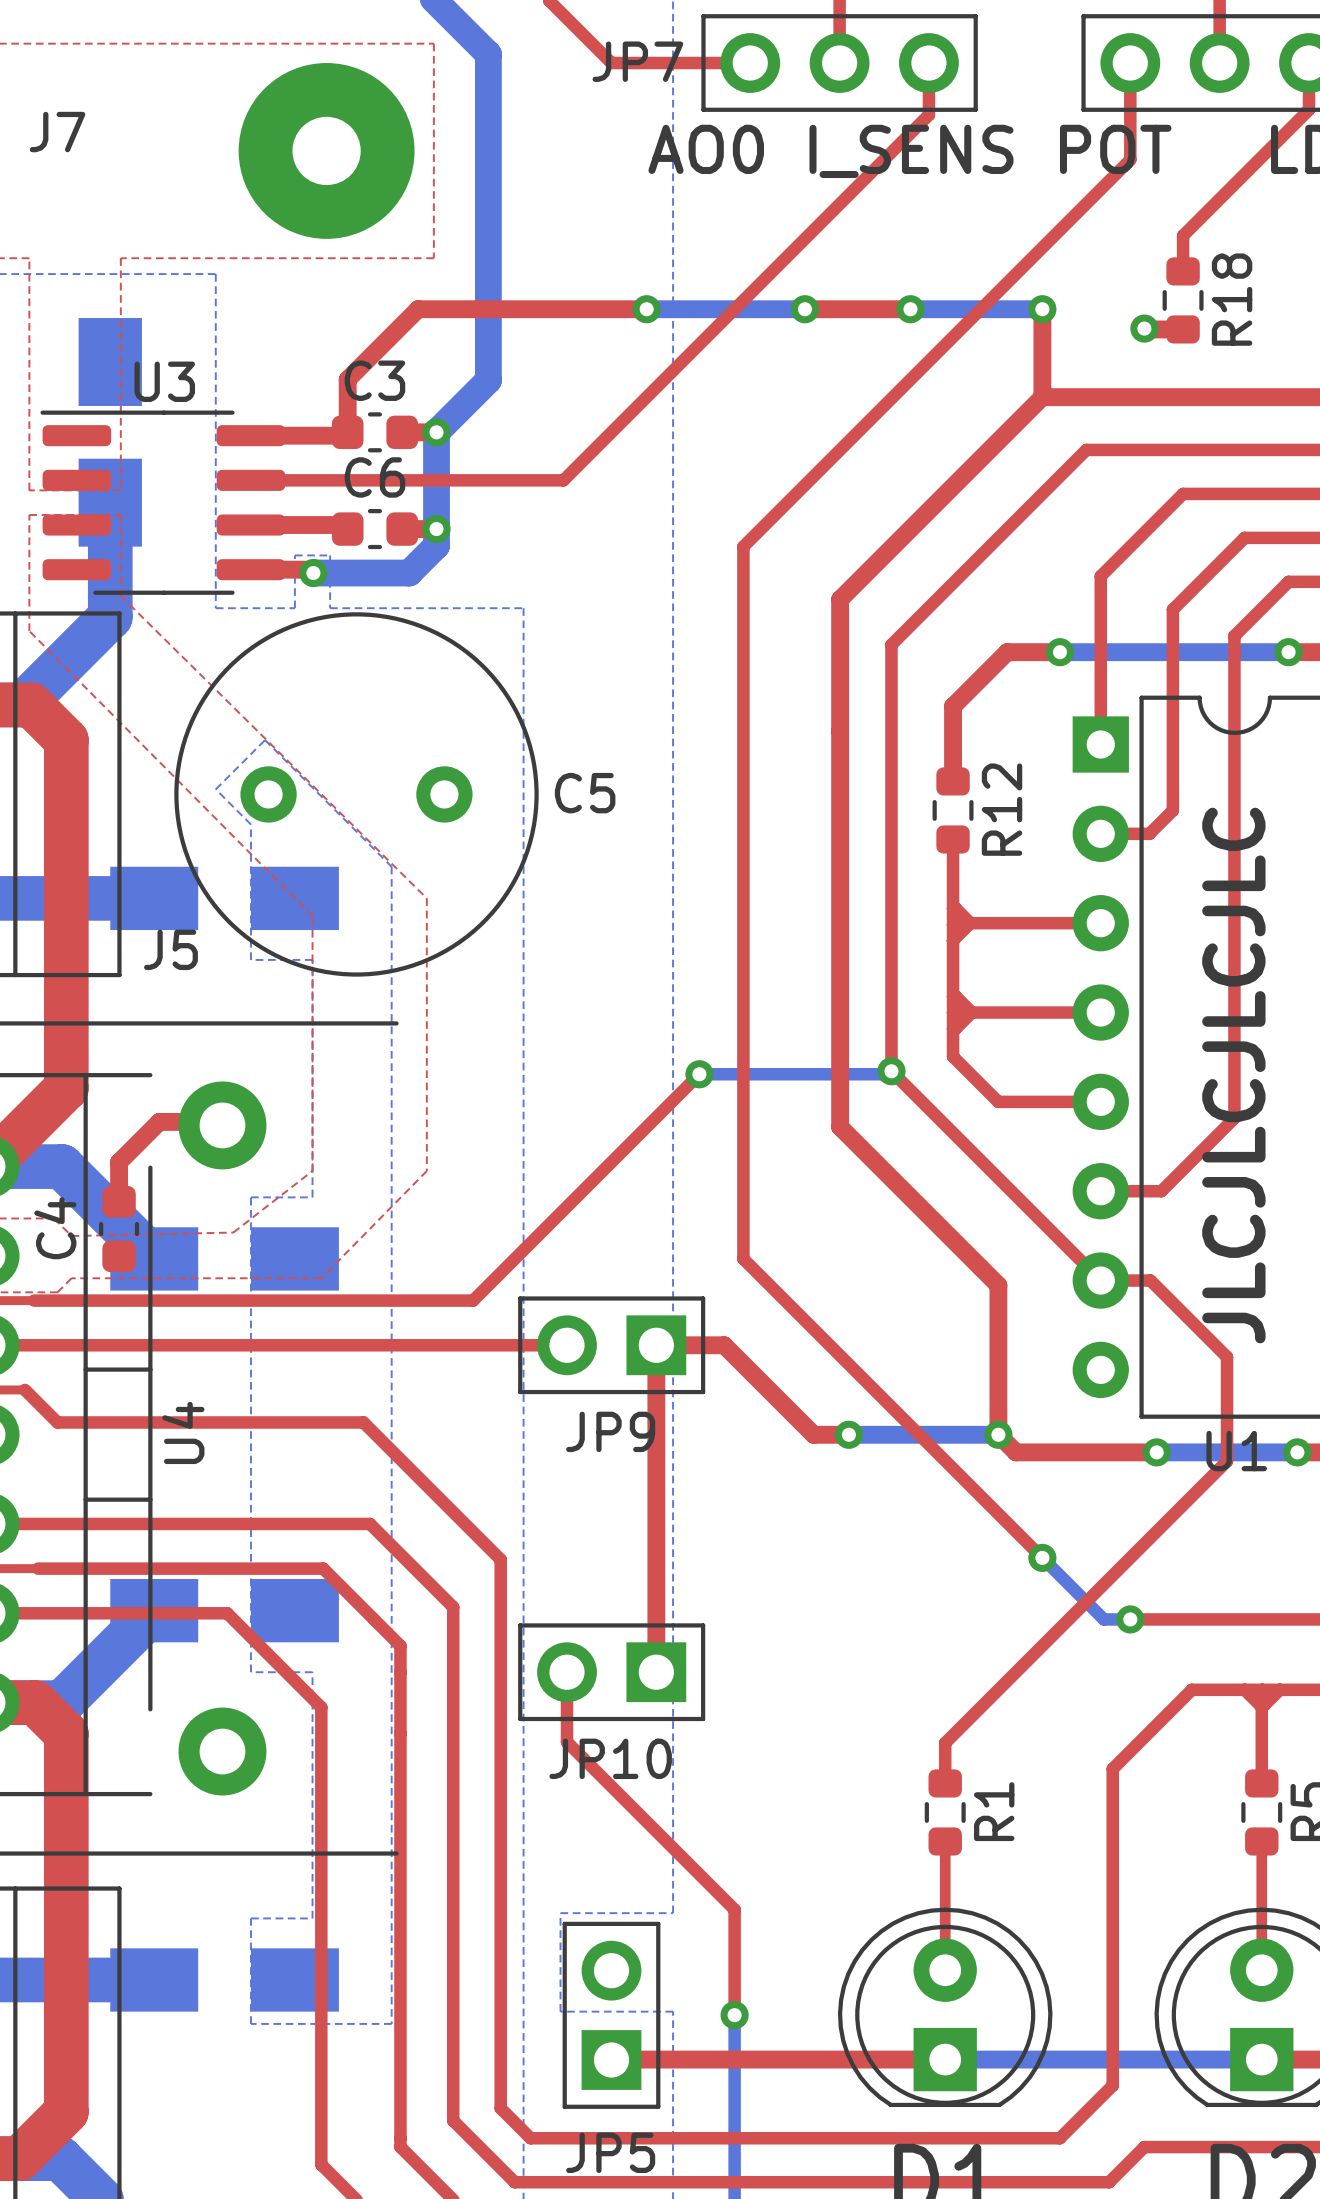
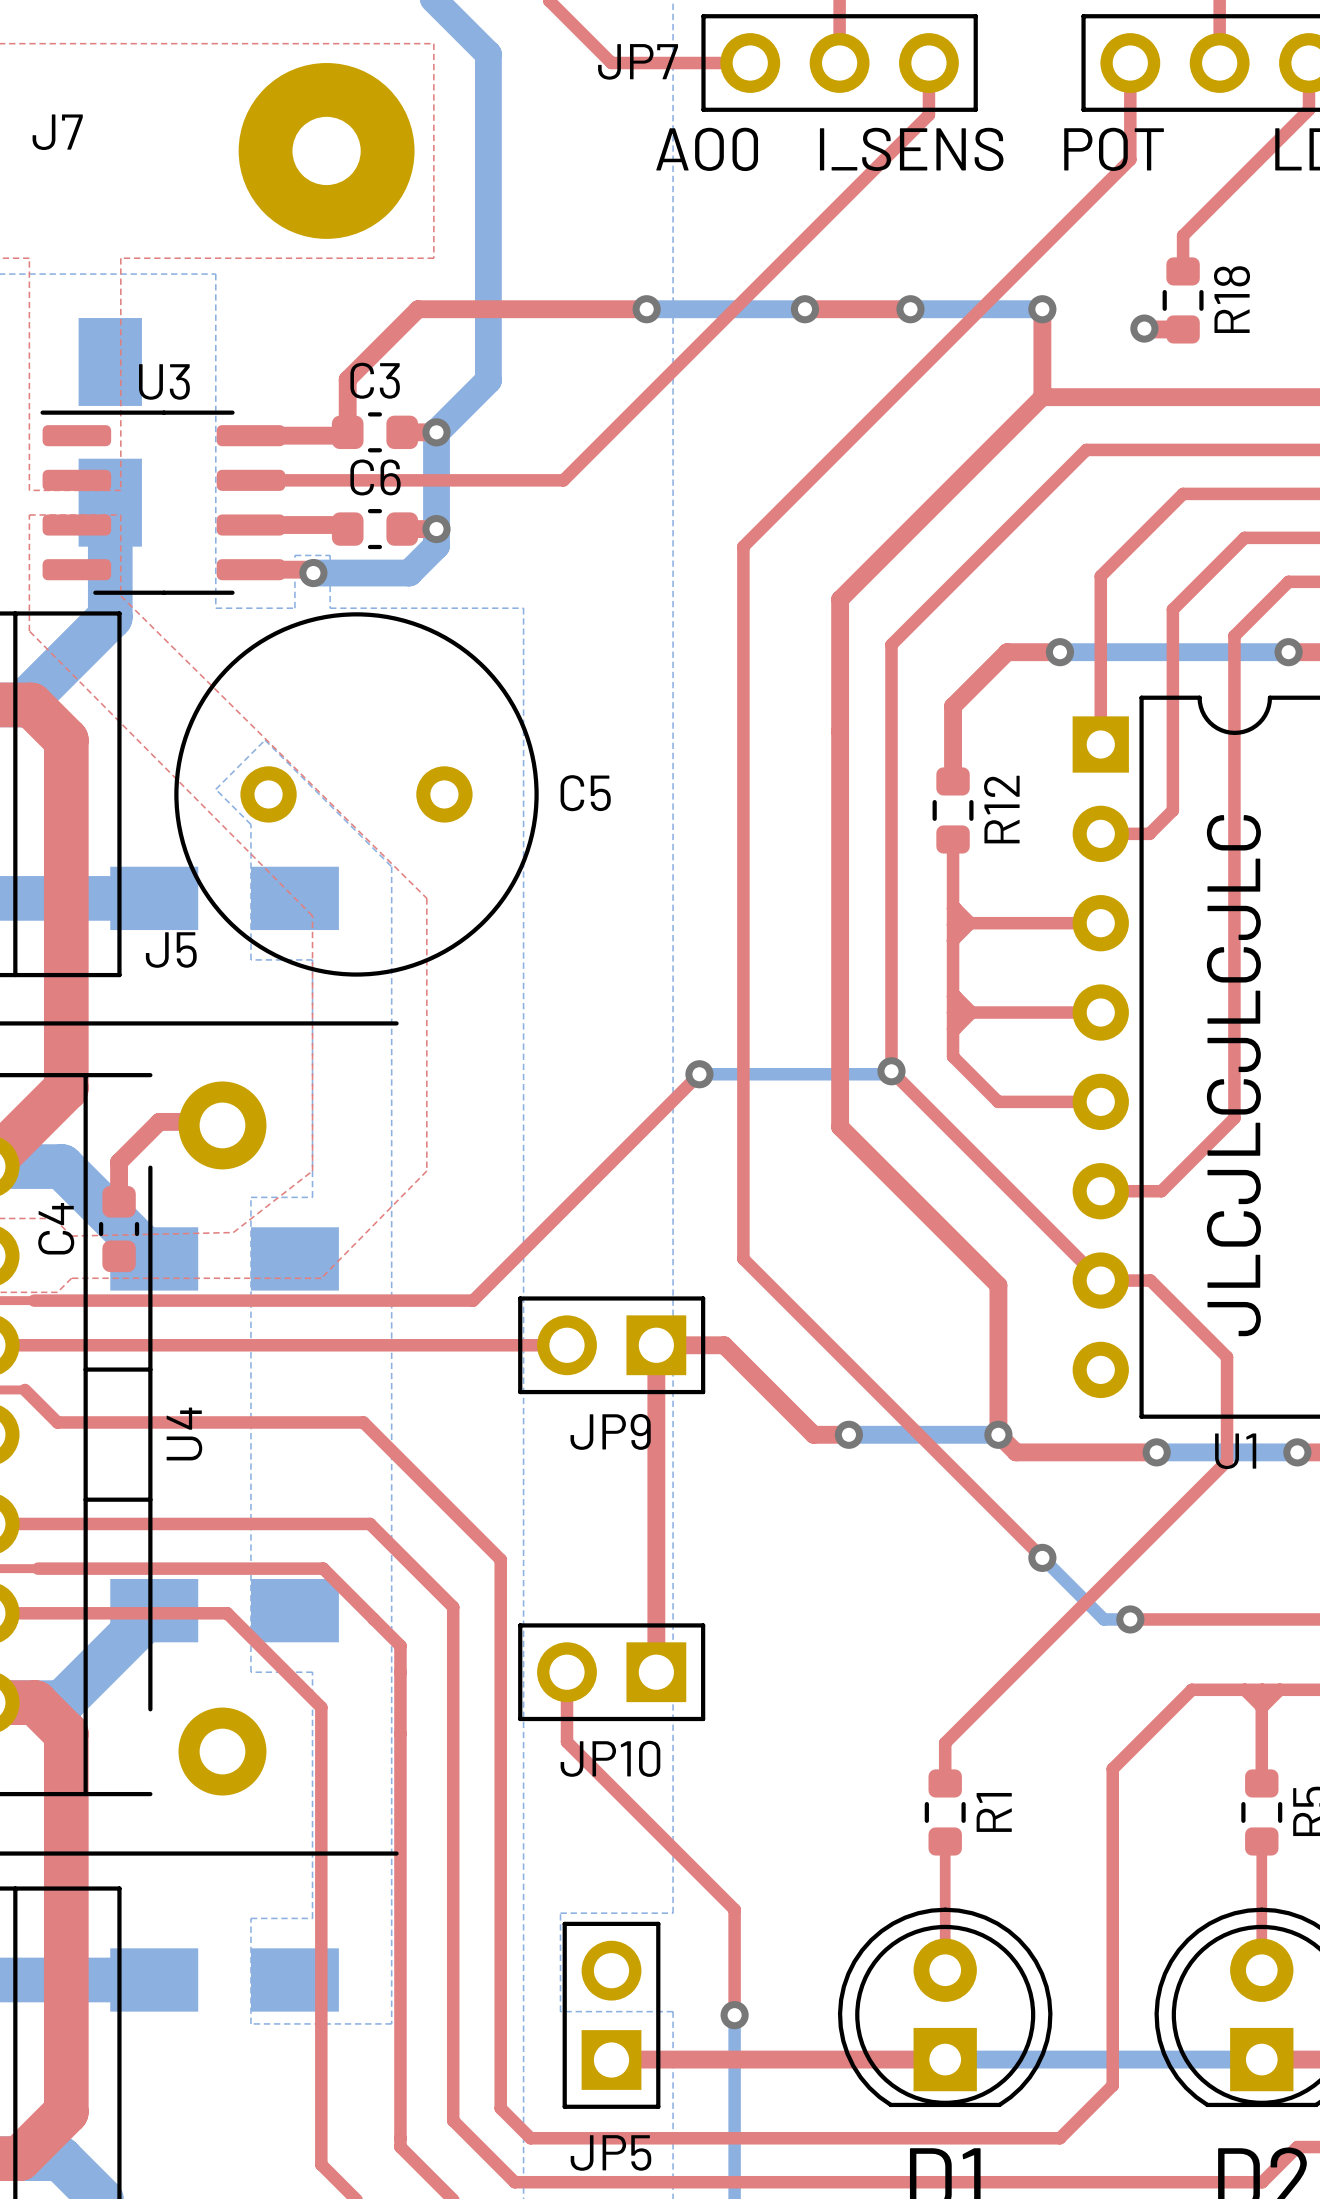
top track: (1297, 2147) (1144, 2147) (1109, 2182) -> (1297, 2147) (1262, 2182) (1109, 2182)

